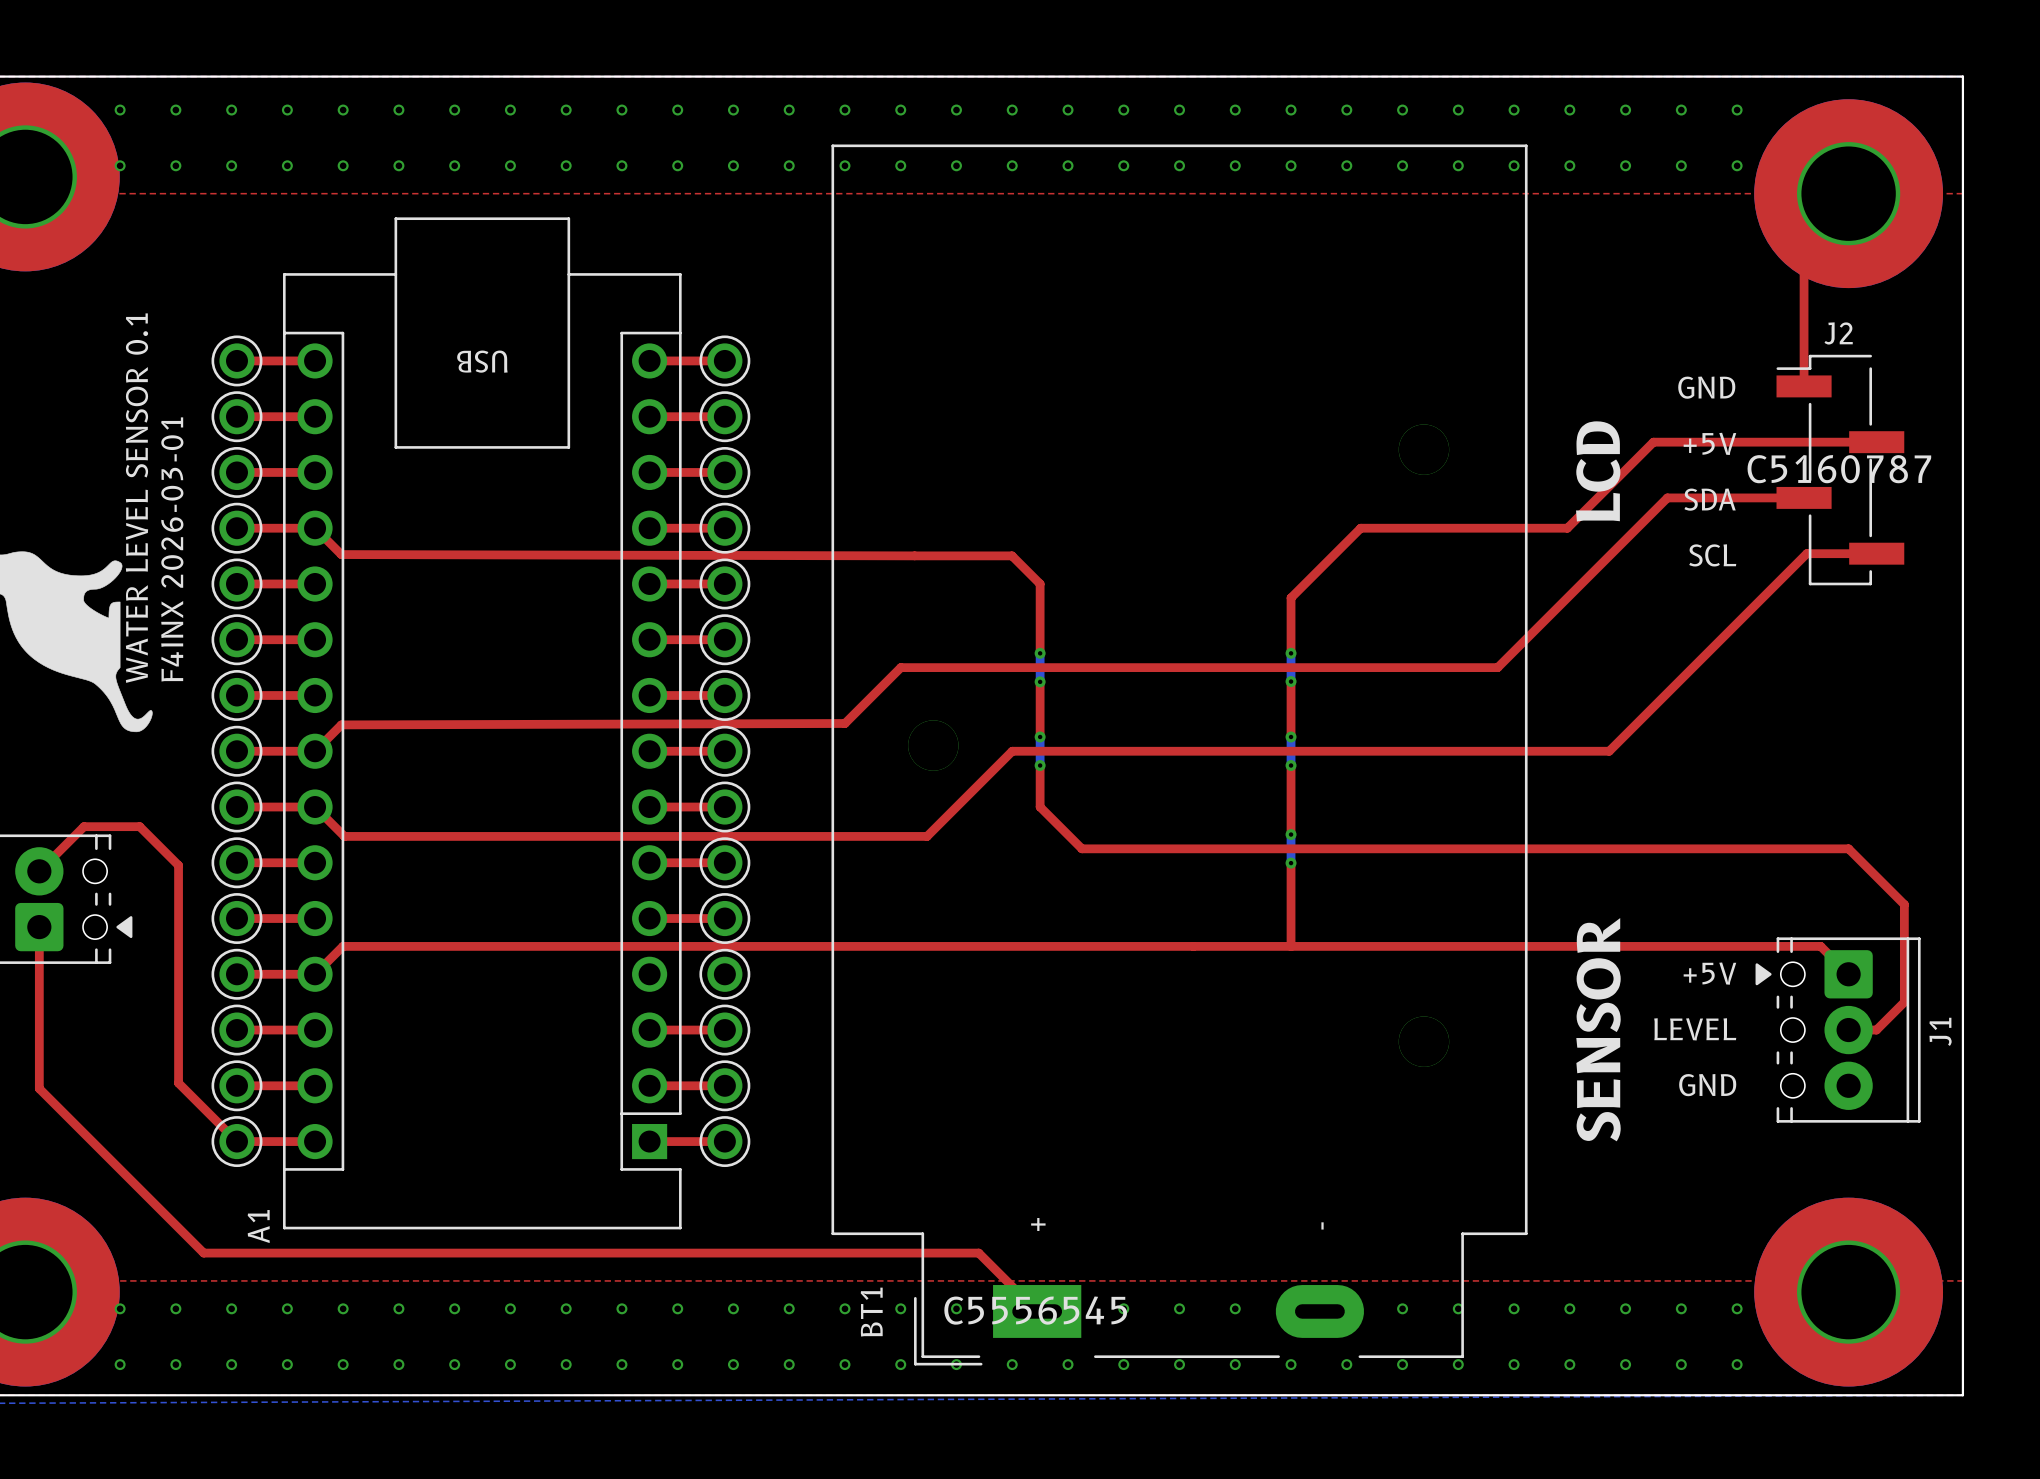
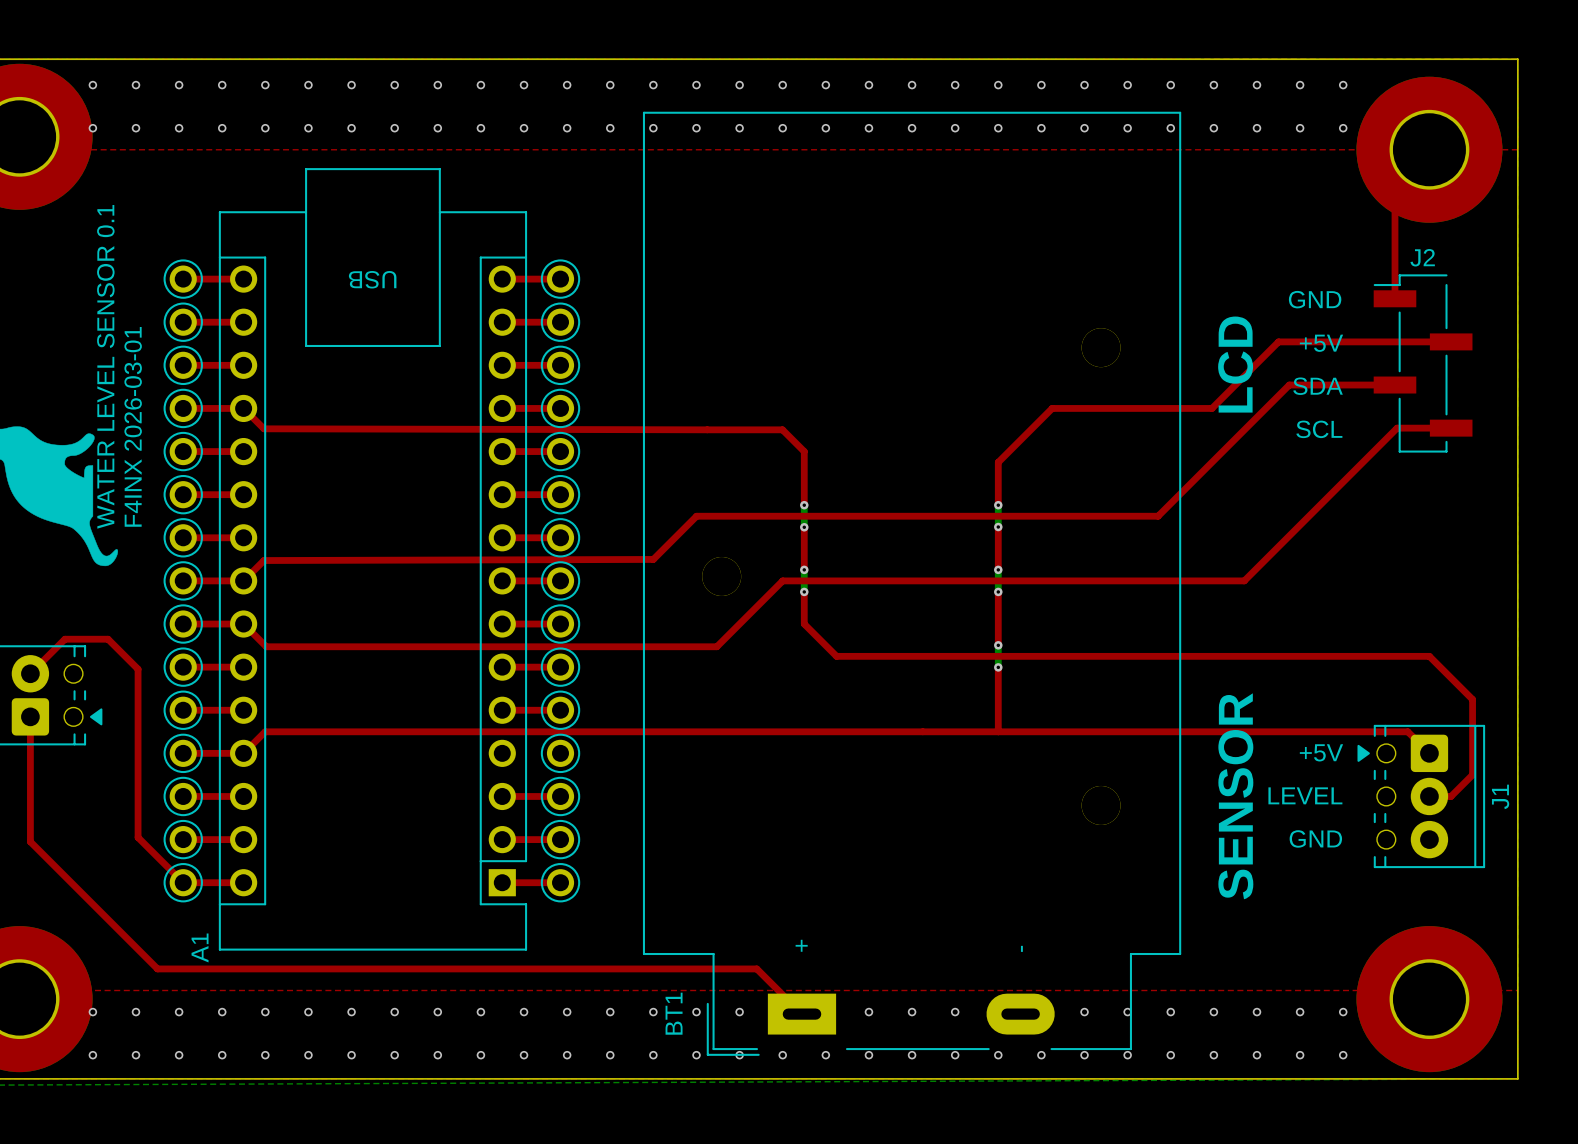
J2 text: C5160787 (1839, 469) -> none
BT1 text: C5556545 (1035, 1310) -> none

